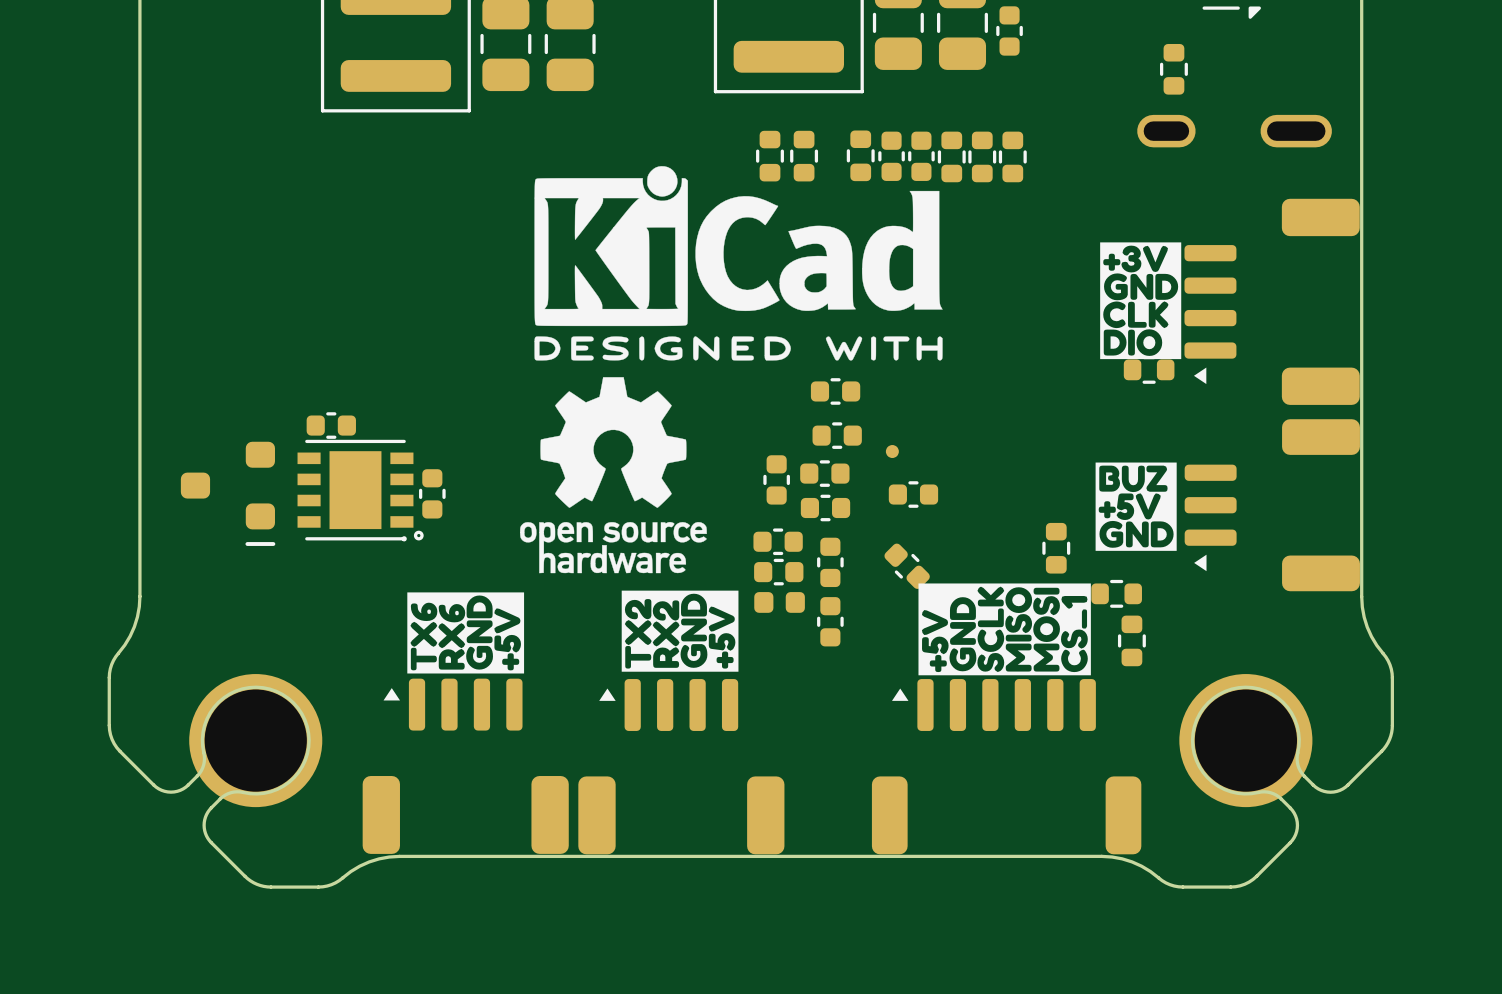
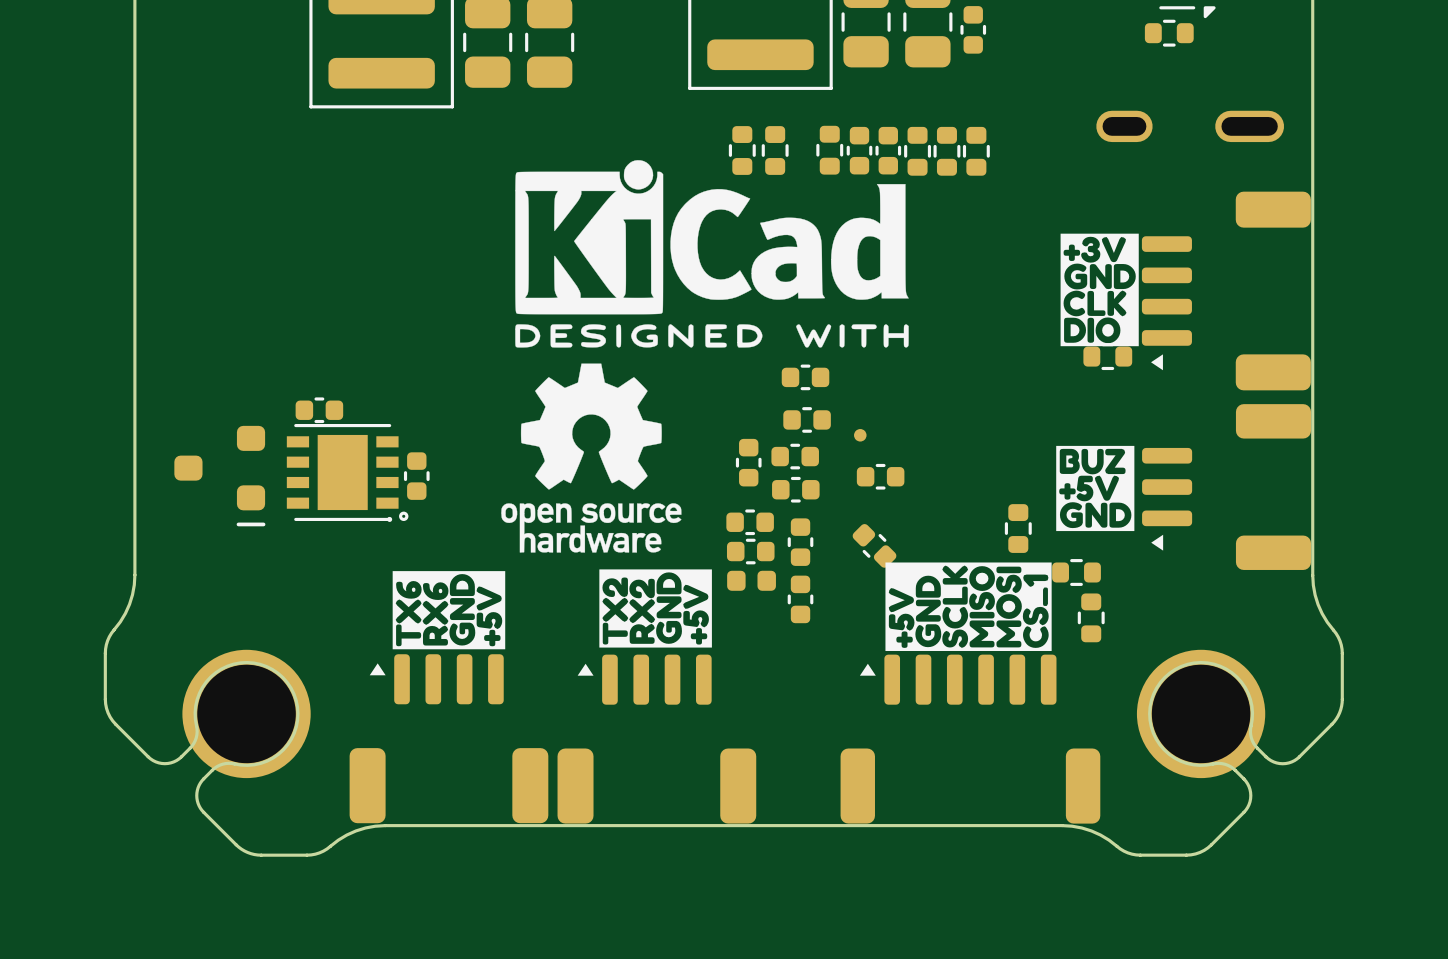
part rotation: 0° (1173, 69) -> 90° clockwise (1169, 33)
part position: (1173, 69) -> (1169, 33)

